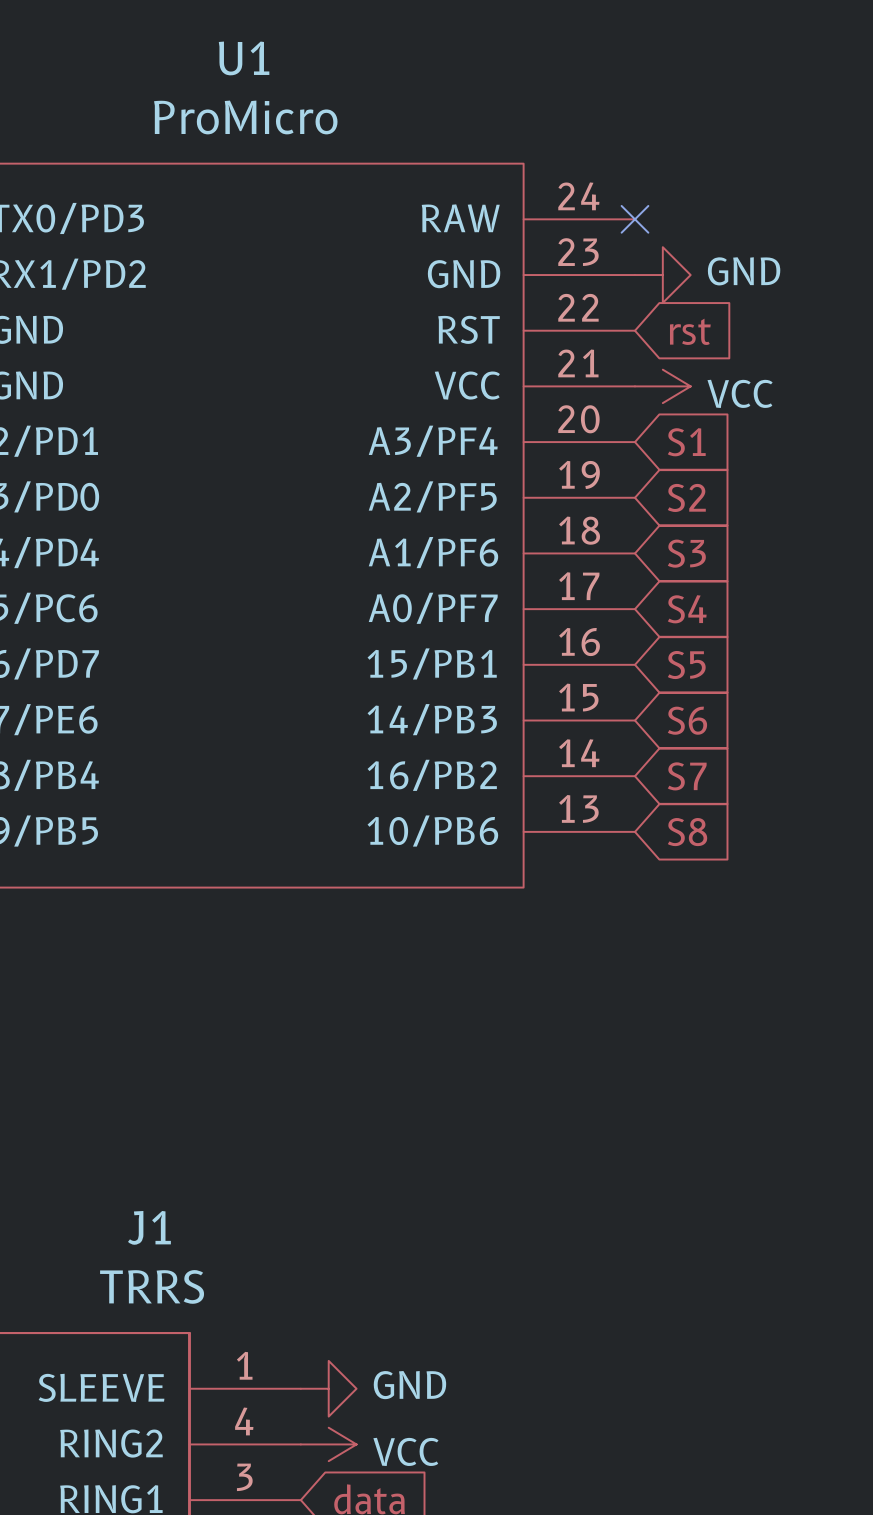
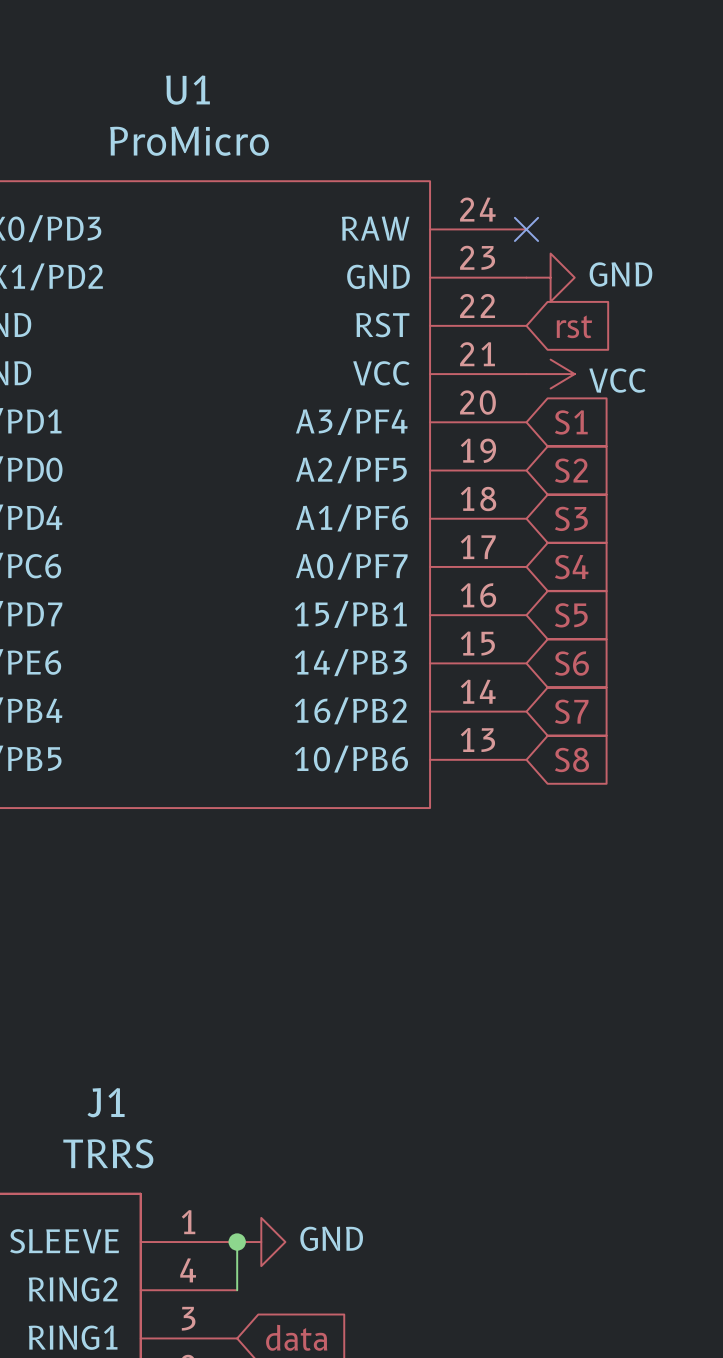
wire: none -> (237, 1242) (237, 1290)
junction: none -> (237, 1242)
power symbol: VCC (328, 1444) -> none

